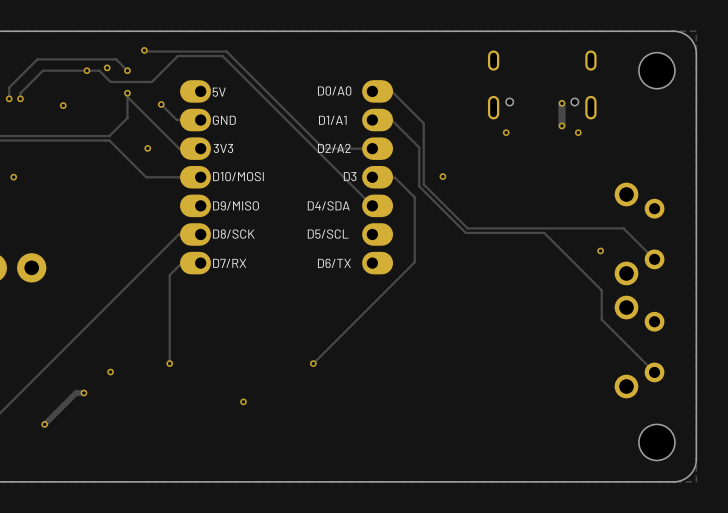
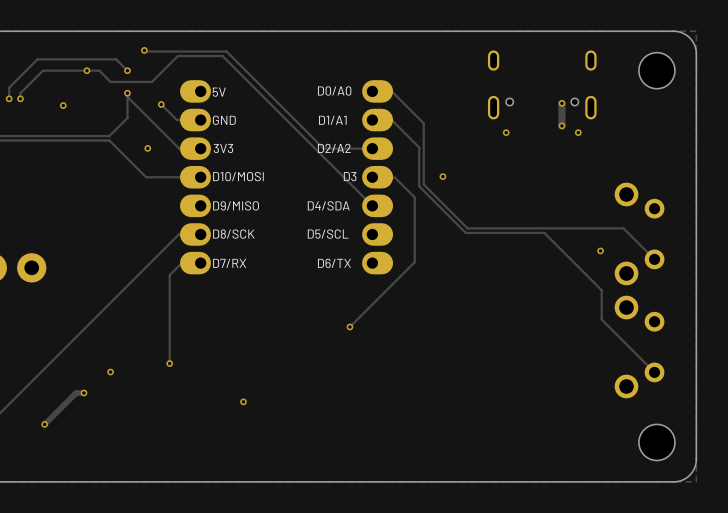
via: (107, 67) -> none
via: (13, 177) -> none
track: (349, 326) (313, 363) -> none
via position: (313, 363) -> (349, 326)

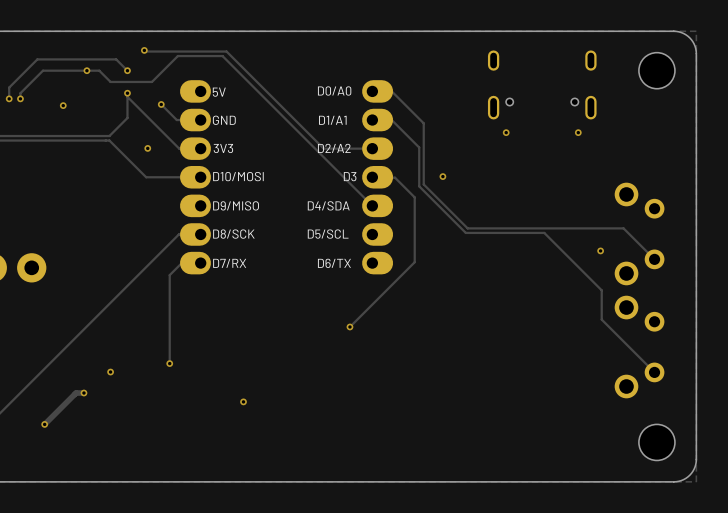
track: (561, 103) (561, 125) -> none
via: (561, 103) -> none
via: (561, 125) -> none

